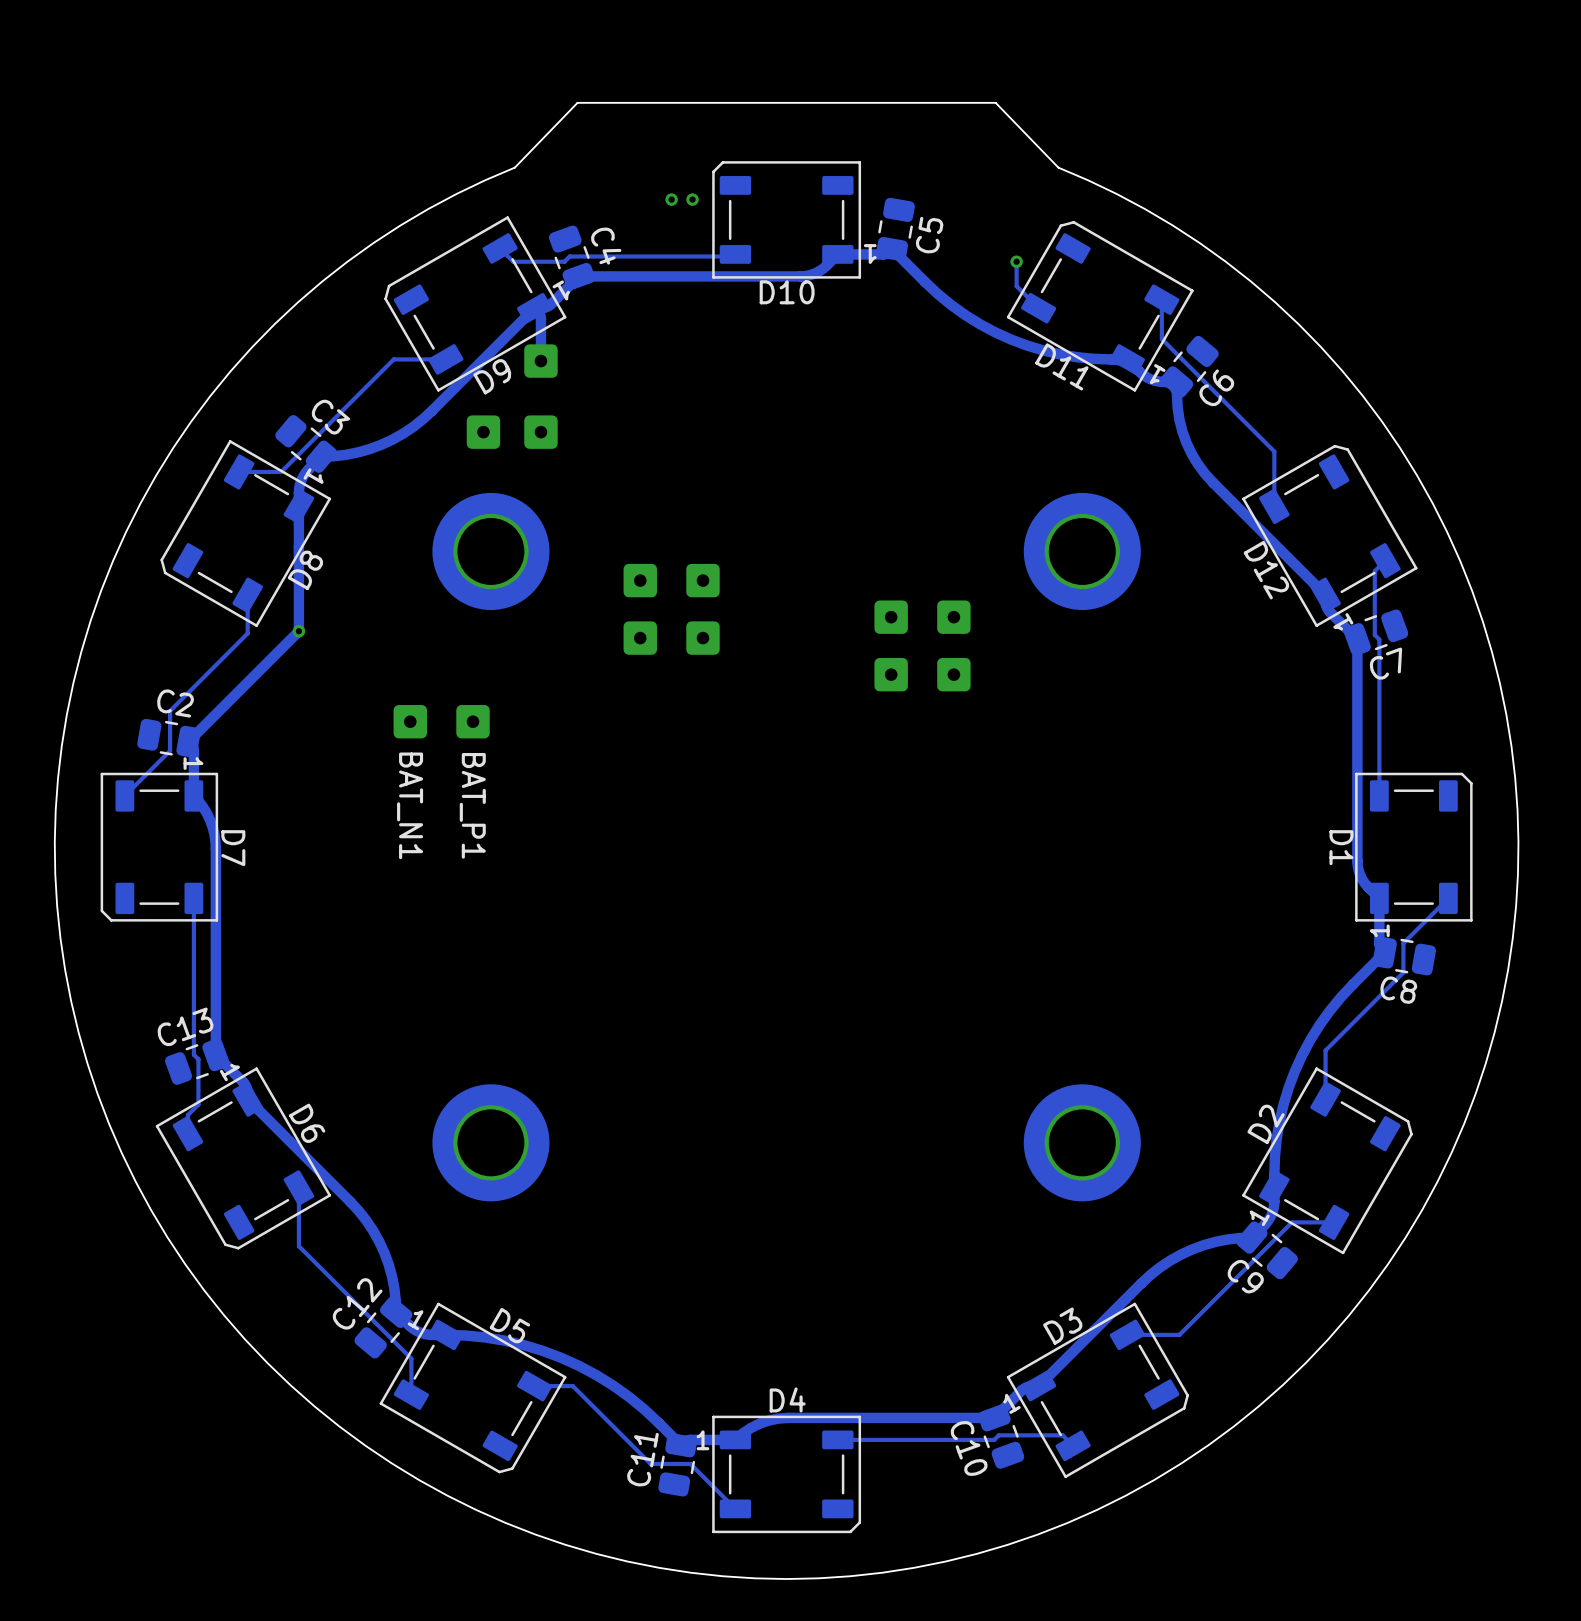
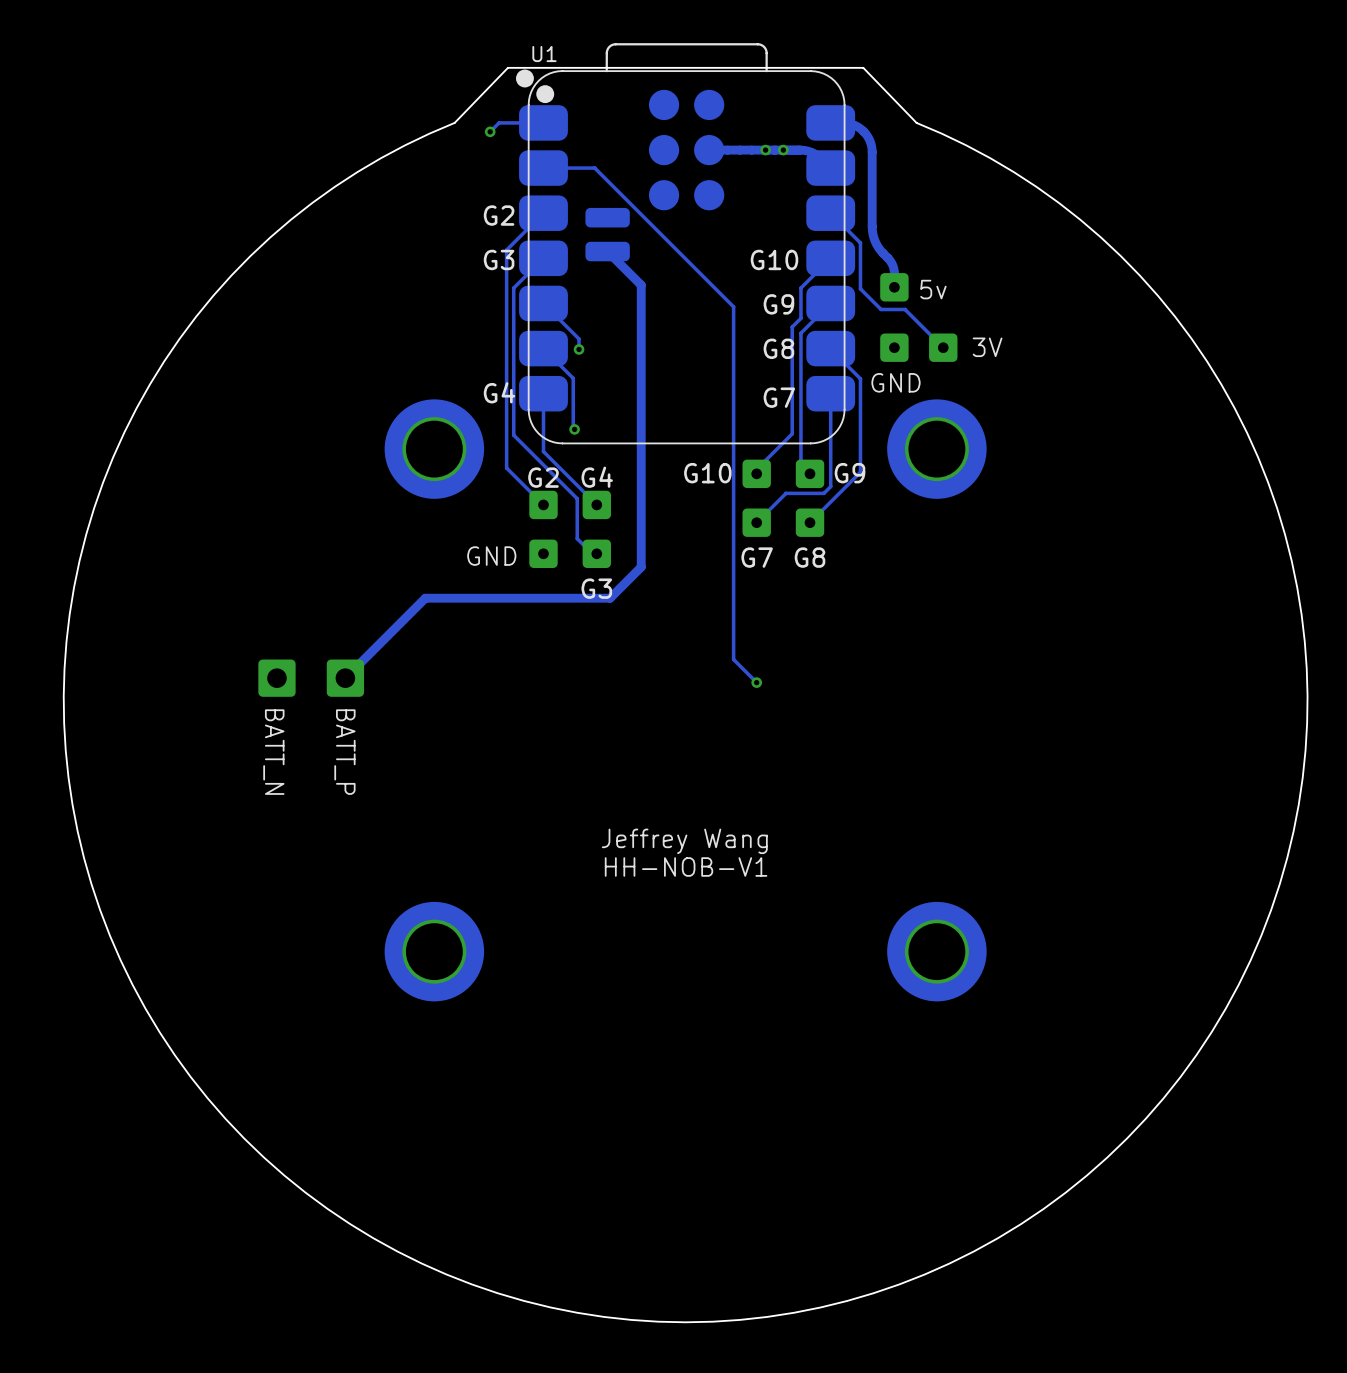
track: none -> (543, 122) (499, 122) (490, 131)
track: none -> (830, 122) (854, 125) (863, 131) (869, 140) (872, 152) (872, 234) (878, 247) (892, 265) (894, 282)
via: none -> (490, 131)
via: (671, 199) -> none
via: (692, 199) -> none
track: none -> (709, 150) (804, 150) (815, 154) (830, 168)
via: none -> (765, 150)
via: none -> (783, 150)
D10: (786, 219) -> none
track: none -> (543, 168) (594, 168) (733, 306) (733, 659) (756, 682)
C5: (895, 229) -> none
track: (500, 248) (513, 261) (564, 261) (569, 256) (733, 256) (735, 254) -> none
C4: (572, 257) -> none
track: (1016, 261) (1016, 286) (1038, 308) -> none
via: (1016, 261) -> none
track: none -> (543, 213) (506, 250) (506, 468) (543, 504)
track: none -> (830, 213) (860, 242) (860, 288) (881, 309) (905, 309) (943, 347)
text: none -> G2 (499, 215)
track: (1161, 299) (1161, 339) (1274, 451) (1274, 506) -> none
D9: (475, 303) -> none
D11: (1100, 306) -> none
track: (539, 308) (550, 305) (578, 276) (805, 276) (819, 271) (837, 254) (882, 254) (893, 250) (951, 305) (995, 332) (1026, 345) (1060, 354) (1122, 361) (1150, 379) (1171, 384) (1176, 392) (1182, 431) (1197, 464) (1213, 482) (1321, 590) (1328, 610) (1357, 639) (1357, 865) (1362, 879) (1379, 898) (1379, 944) (1383, 953) (1329, 1010) (1310, 1040) (1294, 1071) (1283, 1104) (1276, 1139) (1274, 1204) (1271, 1214) (1266, 1222) (1251, 1237) (1227, 1239) (1203, 1245) (1180, 1254) (1160, 1267) (1141, 1283) (1043, 1381) (1022, 1389) (994, 1417) (778, 1418) (750, 1427) (735, 1439) (689, 1439) (680, 1443) (629, 1397) (596, 1375) (561, 1357) (504, 1340) (419, 1332) (412, 1328) (396, 1312) (394, 1287) (388, 1264) (379, 1241) (366, 1220) (350, 1201) (252, 1103) (244, 1083) (215, 1054) (215, 841) (210, 820) (193, 795) (193, 750) (190, 740) (298, 631) (298, 492) (301, 480) (305, 472) (321, 456) (345, 454) (369, 449) (392, 439) (413, 426) (431, 410) (531, 311) -> none
U1: none -> (685, 243)
track: (537, 311) (540, 317) (540, 355) -> none
track: none -> (607, 251) (641, 285) (641, 567) (610, 598) (425, 598) (345, 678)
track: none -> (543, 258) (513, 288) (513, 435) (577, 498) (577, 538) (596, 558)
track: none -> (830, 258) (800, 288) (800, 318) (792, 327) (792, 433) (756, 469)
text: none -> G3 (499, 259)
text: none -> G10 (774, 259)
track: (445, 359) (393, 359) (281, 471) (239, 471) -> none
part position: (540, 361) -> (894, 287)
text: none -> 5v (933, 289)
C6: (1189, 366) -> none
track: none -> (543, 303) (579, 338) (579, 349)
track: none -> (830, 303) (800, 333) (800, 460) (810, 469)
text: none -> G9 (778, 304)
text: none -> 3V (987, 347)
part: (483, 432) -> none
part position: (540, 432) -> (894, 347)
part: none -> (943, 347)
track: none -> (543, 348) (573, 378) (574, 429)
text: none -> G8 (778, 348)
track: none -> (830, 348) (860, 378) (860, 472) (810, 522)
via: none -> (579, 349)
C3: (306, 443) -> none
text: none -> GND (896, 382)
text: none -> G4 (499, 392)
track: none -> (543, 393) (543, 451) (596, 504)
track: none -> (830, 393) (830, 486) (823, 493) (786, 493) (756, 522)
text: none -> G7 (779, 397)
via: none -> (574, 429)
D8: (245, 533) -> none
D12: (1329, 535) -> none
track: (1385, 560) (1374, 571) (1374, 634) (1379, 639) (1379, 795) -> none
G9 position: (640, 580) -> (810, 473)
G10 position: (702, 580) -> (756, 473)
track: (247, 595) (247, 633) (170, 711) (170, 750) (124, 795) -> none
G4 position: (891, 617) -> (596, 504)
G2 position: (953, 617) -> (543, 504)
via: (298, 631) -> none
C7: (1376, 632) -> none
G8 position: (640, 638) -> (810, 522)
part position: (702, 638) -> (756, 522)
G3 position: (891, 674) -> (596, 553)
part position: (953, 674) -> (543, 553)
text: none -> GND (491, 556)
text: none -> G7 (757, 557)
BAT_N1: (410, 721) -> none
BAT_P1: (473, 721) -> none
C2: (168, 738) -> none
part: none -> (276, 678)
part: none -> (345, 678)
via: none -> (756, 682)
D7: (159, 847) -> none
D1: (1413, 847) -> none
track: (193, 898) (193, 1054) (198, 1059) (198, 1104) (187, 1115) (187, 1133) -> none
track: (1448, 898) (1403, 943) (1403, 972) (1325, 1050) (1325, 1099) -> none
text: none -> BATT_N (273, 752)
text: none -> BATT_P (344, 752)
C8: (1404, 956) -> none
text: none -> Jeffrey Wang (684, 841)
text: none -> HH-NOB-V1 (686, 866)
C13: (197, 1061) -> none
D6: (243, 1158) -> none
D2: (1327, 1160) -> none
track: (298, 1187) (298, 1246) (411, 1358) (411, 1394) -> none
track: (1334, 1222) (1291, 1222) (1179, 1334) (1127, 1334) -> none
C9: (1267, 1250) -> none
C12: (383, 1327) -> none
track: (534, 1386) (572, 1386) (650, 1463) (690, 1463) (735, 1508) -> none
D5: (473, 1388) -> none
D3: (1097, 1390) -> none
C10: (1001, 1436) -> none
track: (837, 1439) (994, 1439) (998, 1435) (1062, 1435) (1073, 1445) -> none
C11: (677, 1464) -> none
D4: (786, 1474) -> none

